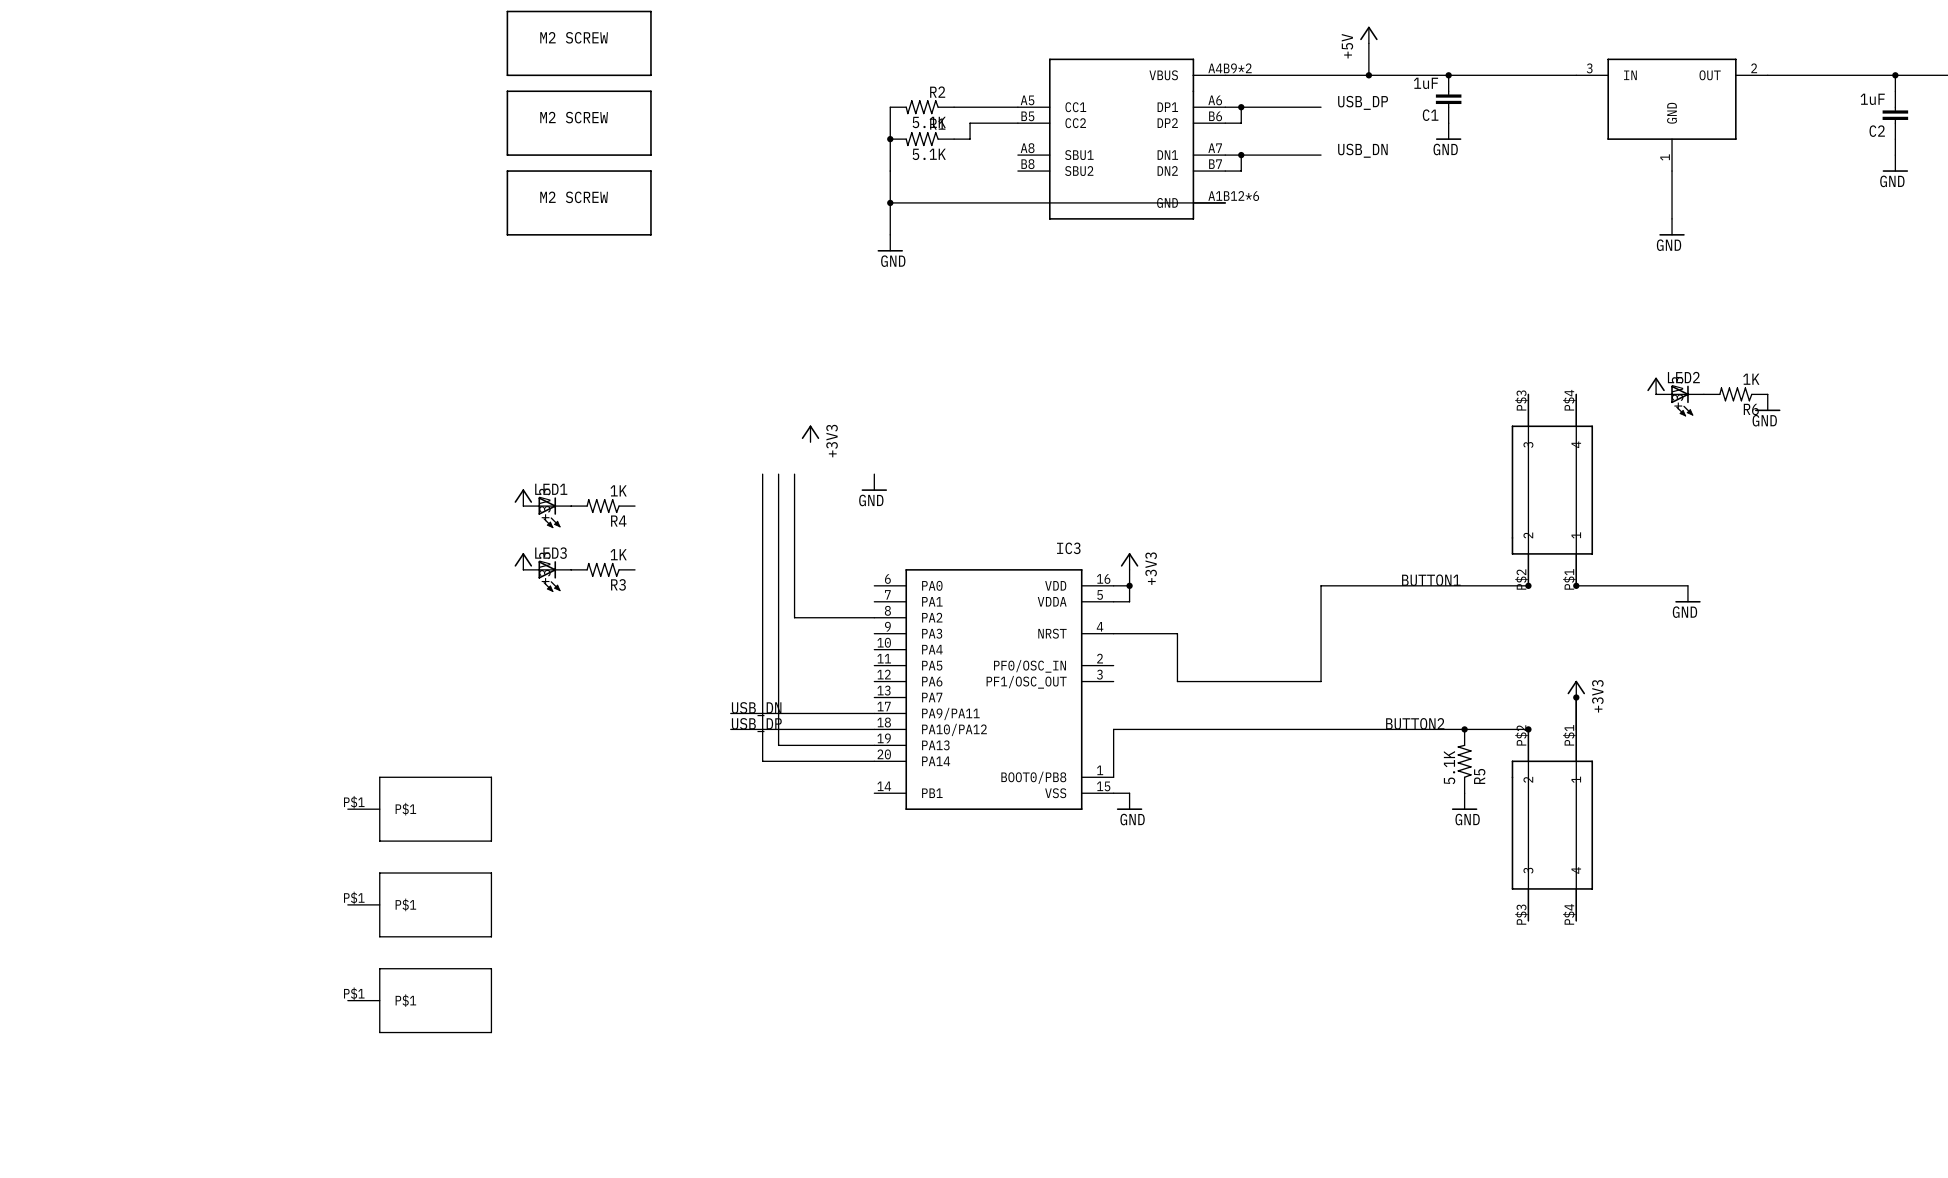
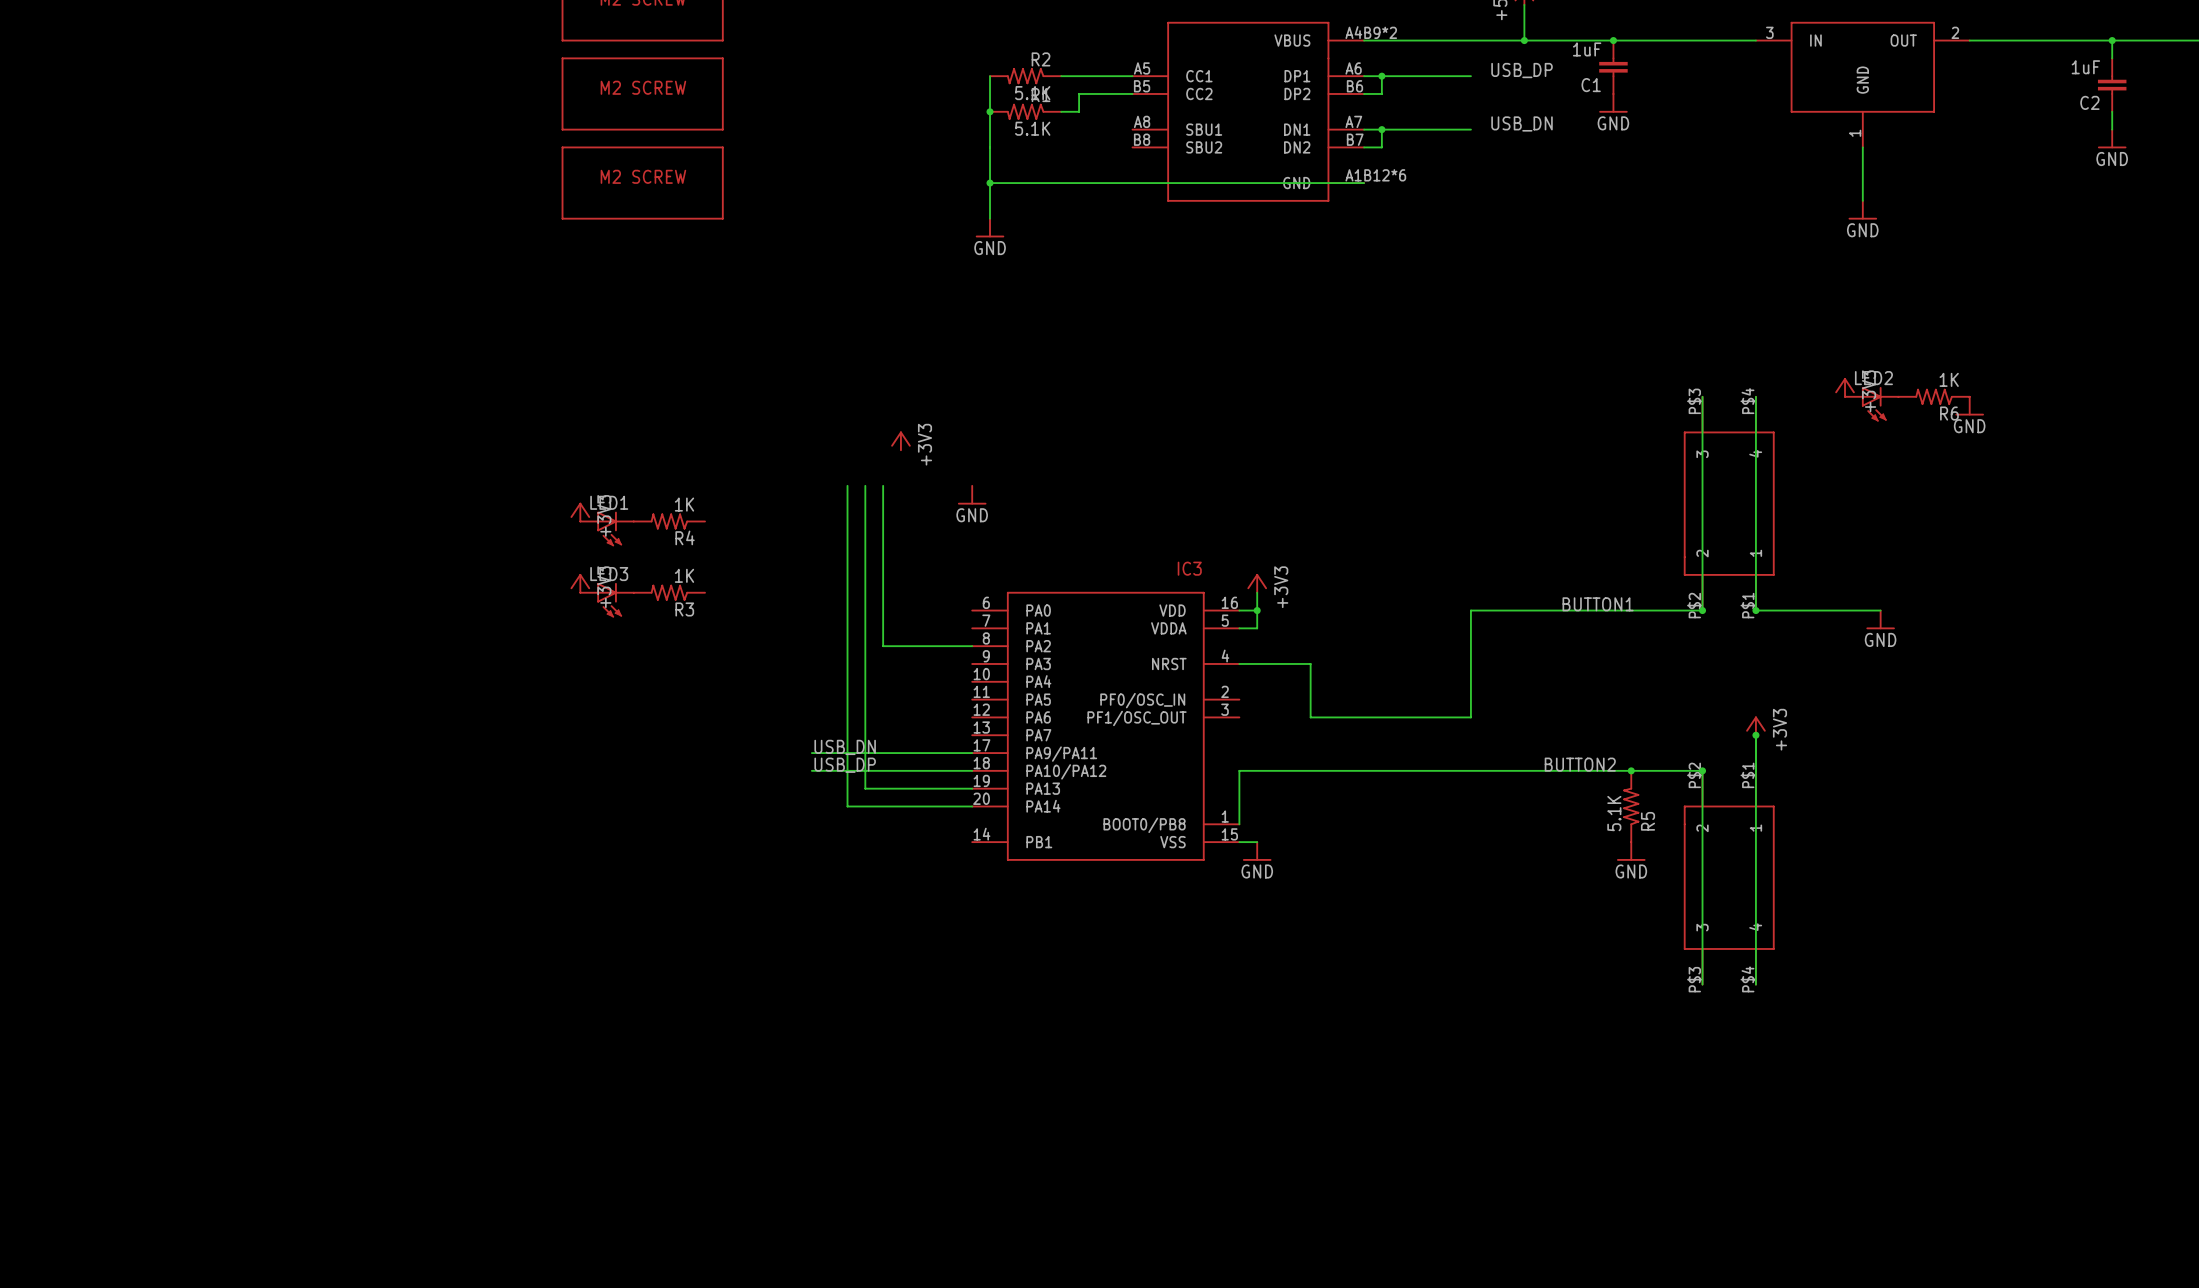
part: (419, 809) -> none
part: (419, 904) -> none
part: (419, 1000) -> none

